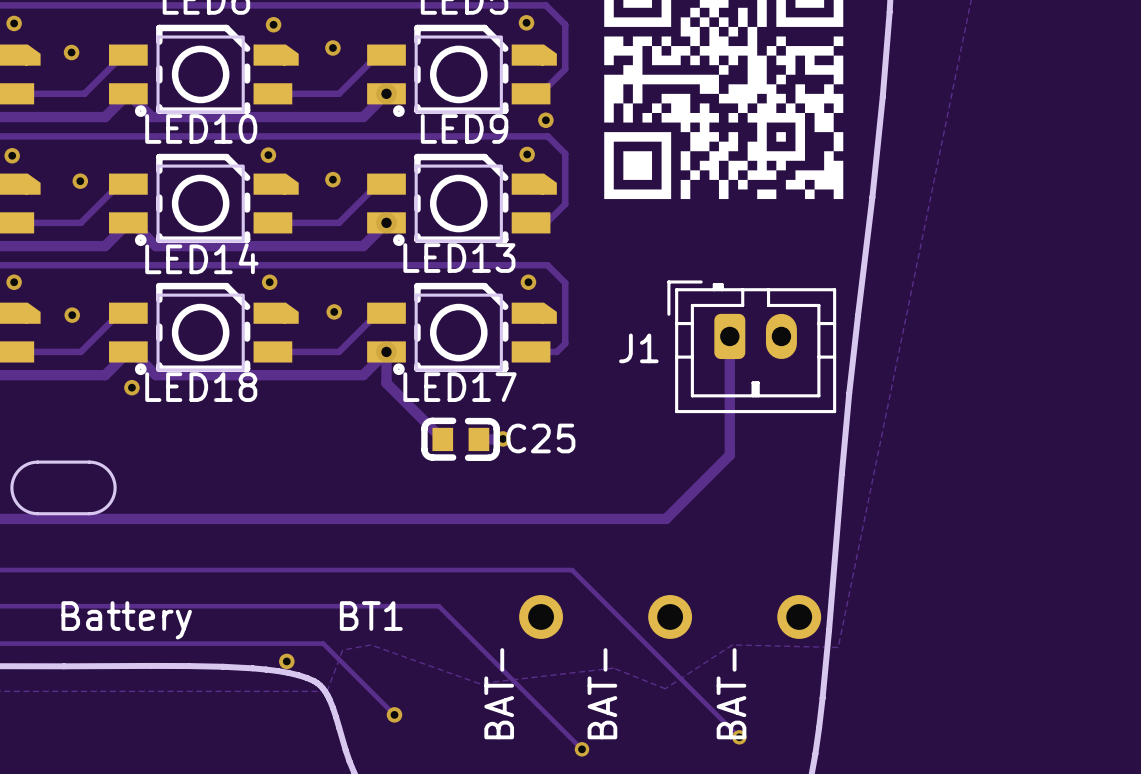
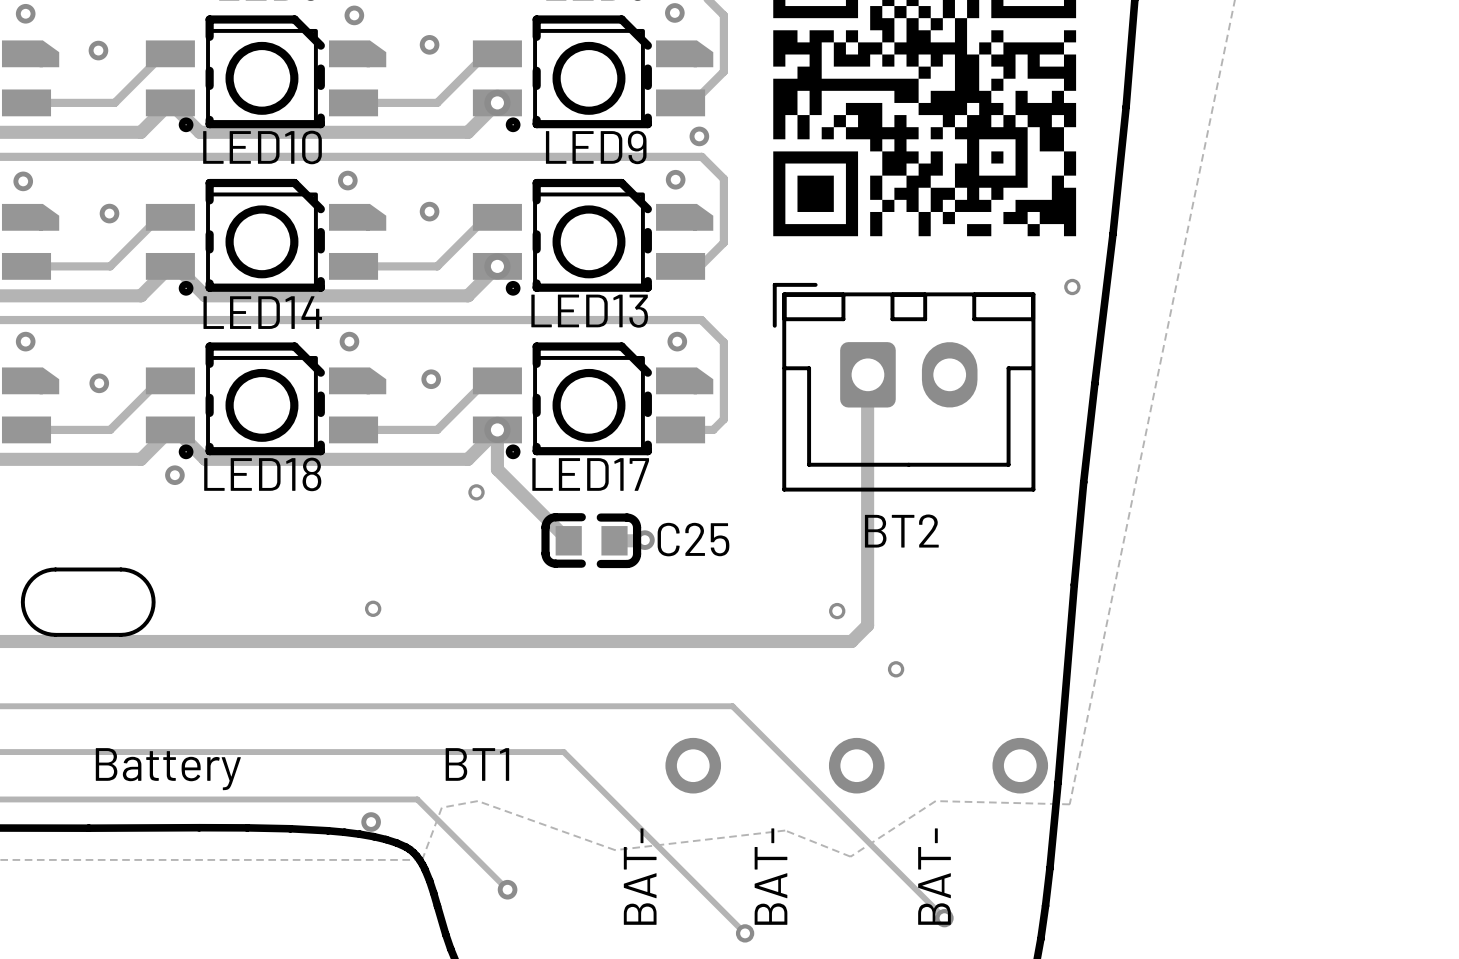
via: none -> (1072, 287)
BT2: none -> (904, 387)
track: (729, 336) (729, 455) (678, 506) -> (867, 375) (867, 625)
J1: (751, 346) -> none
via: none -> (476, 492)
via: none -> (373, 608)
via: none -> (837, 611)
via: none -> (896, 669)

